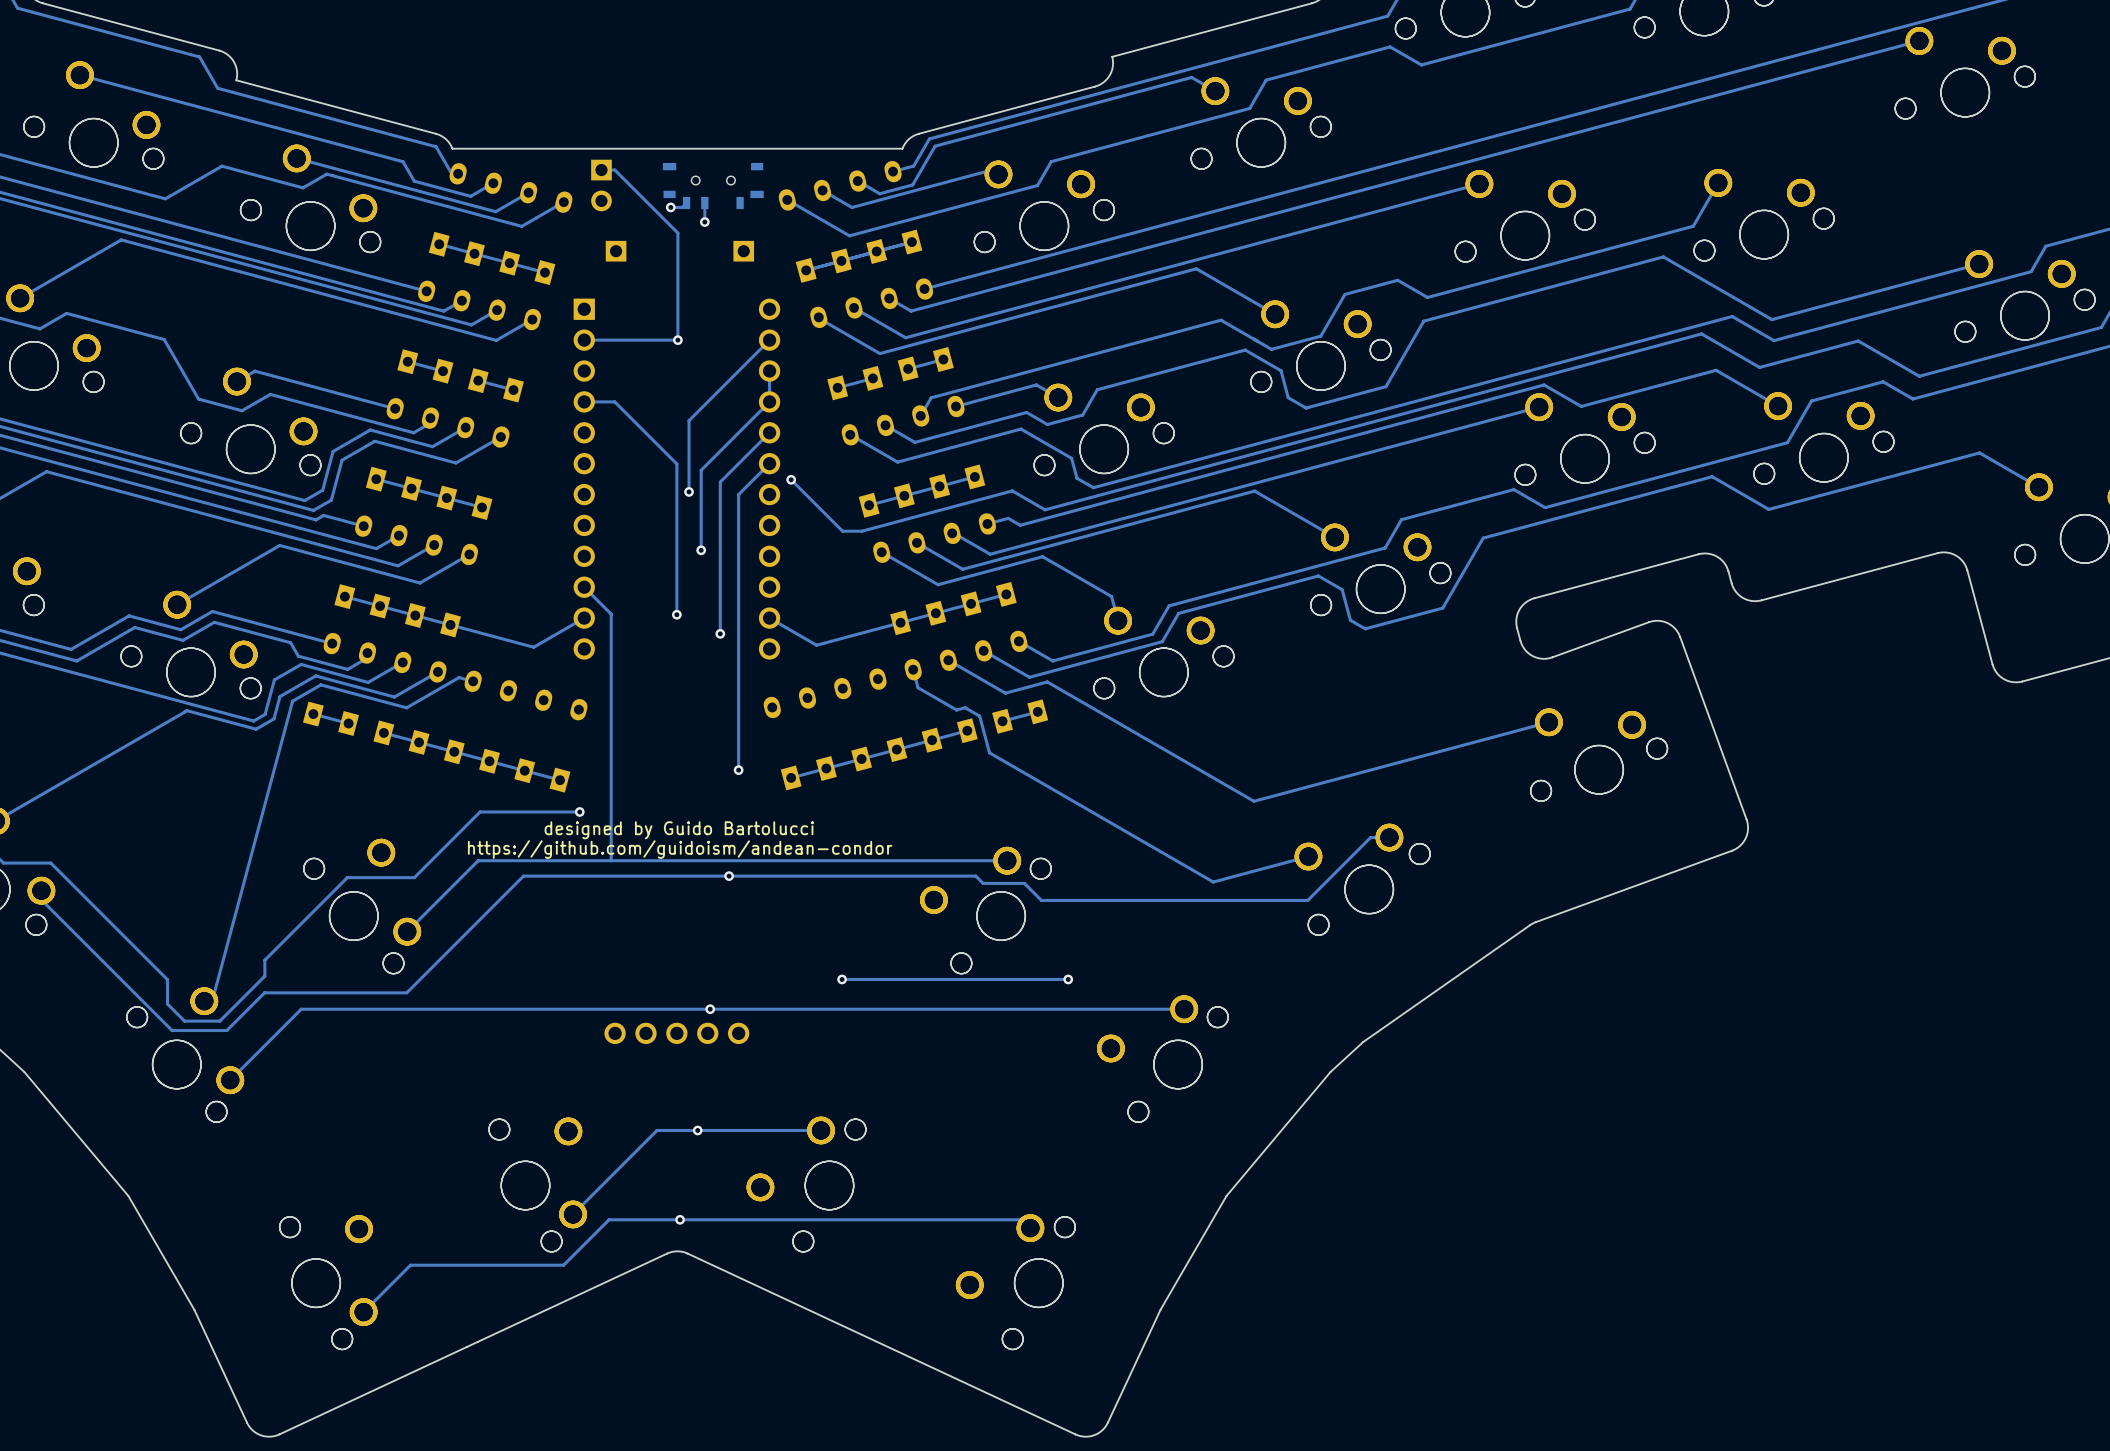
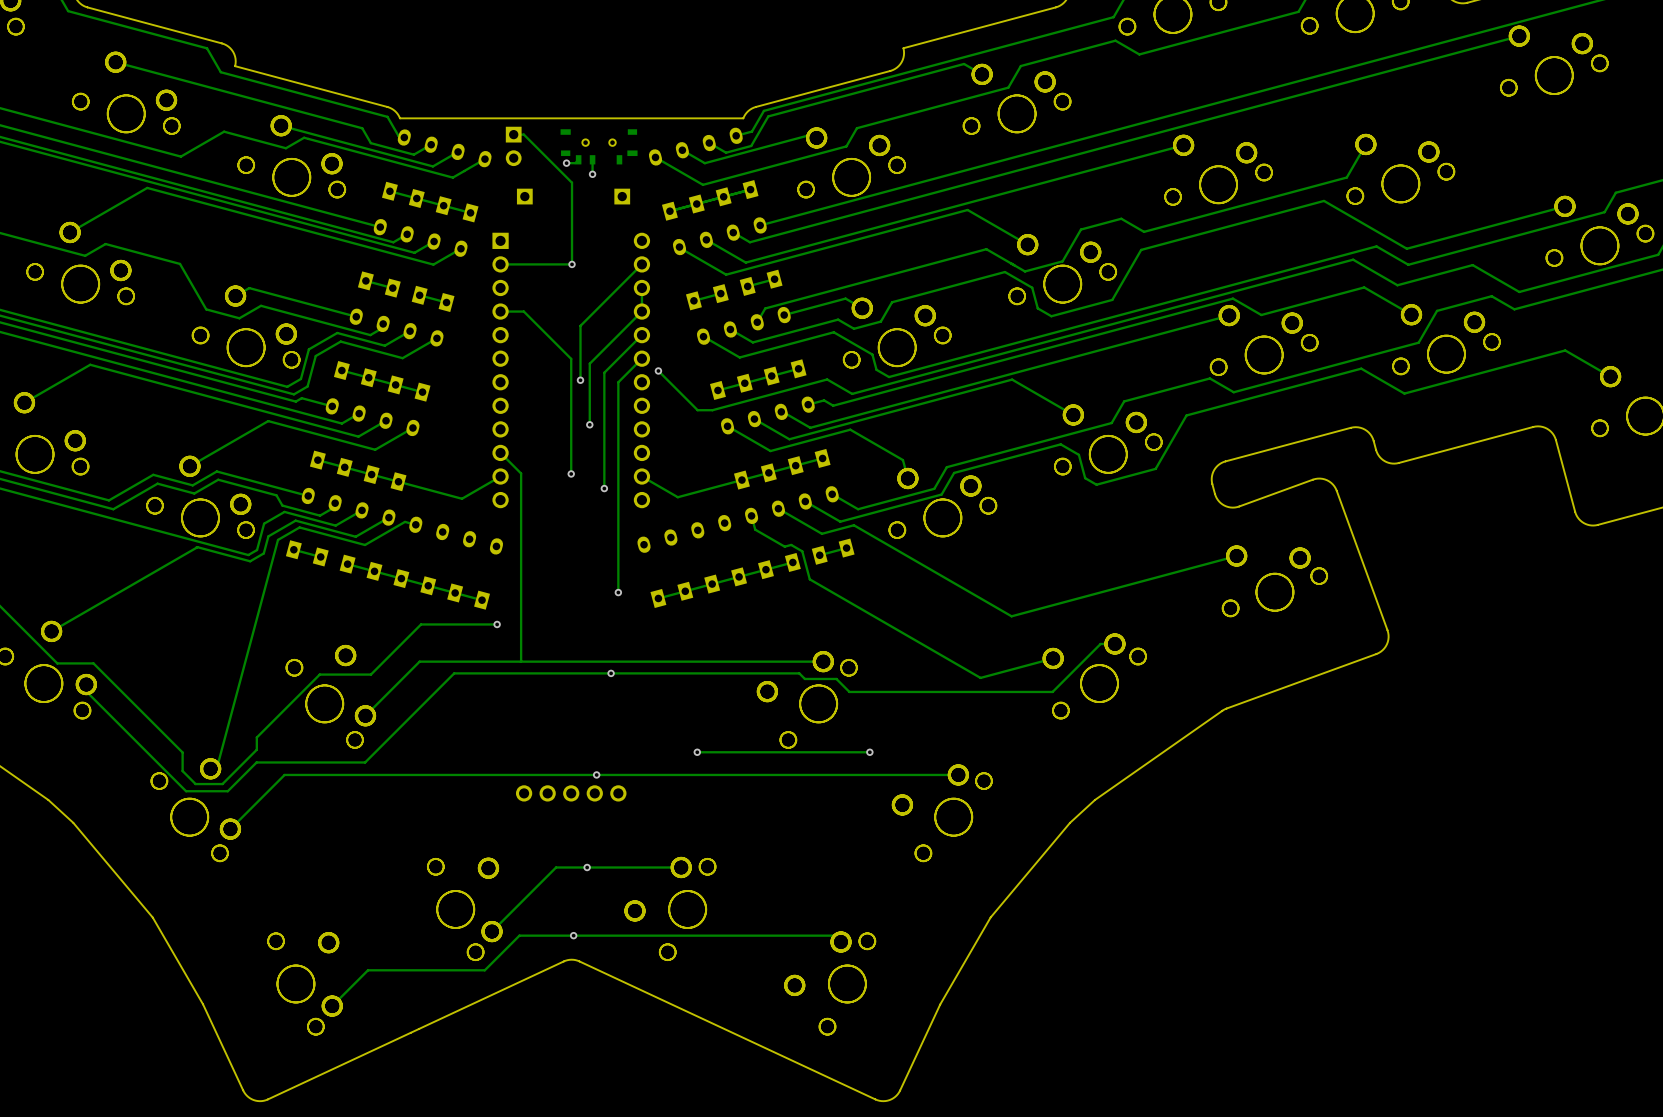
text: designed by Guido Bartolucci (679, 830) -> none
text: https://github.com/guidoism/andean-condor (680, 849) -> none

